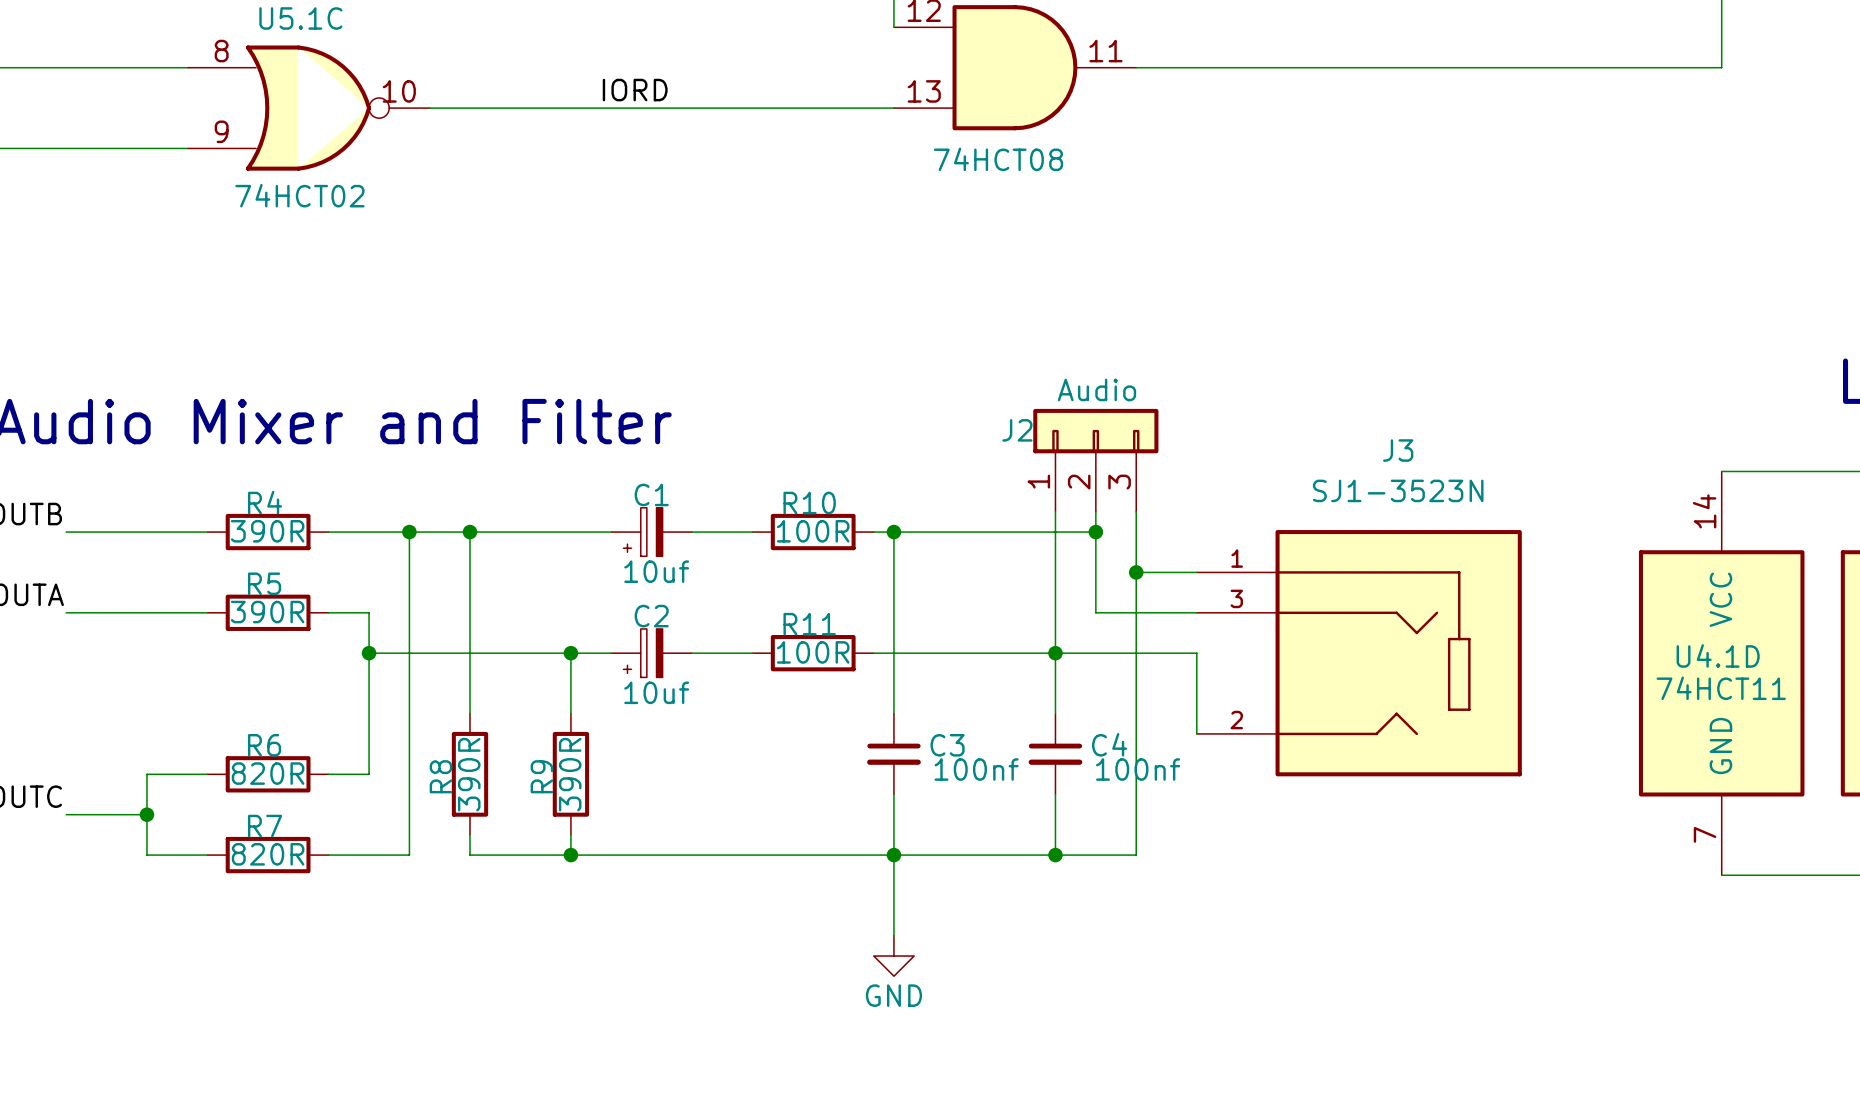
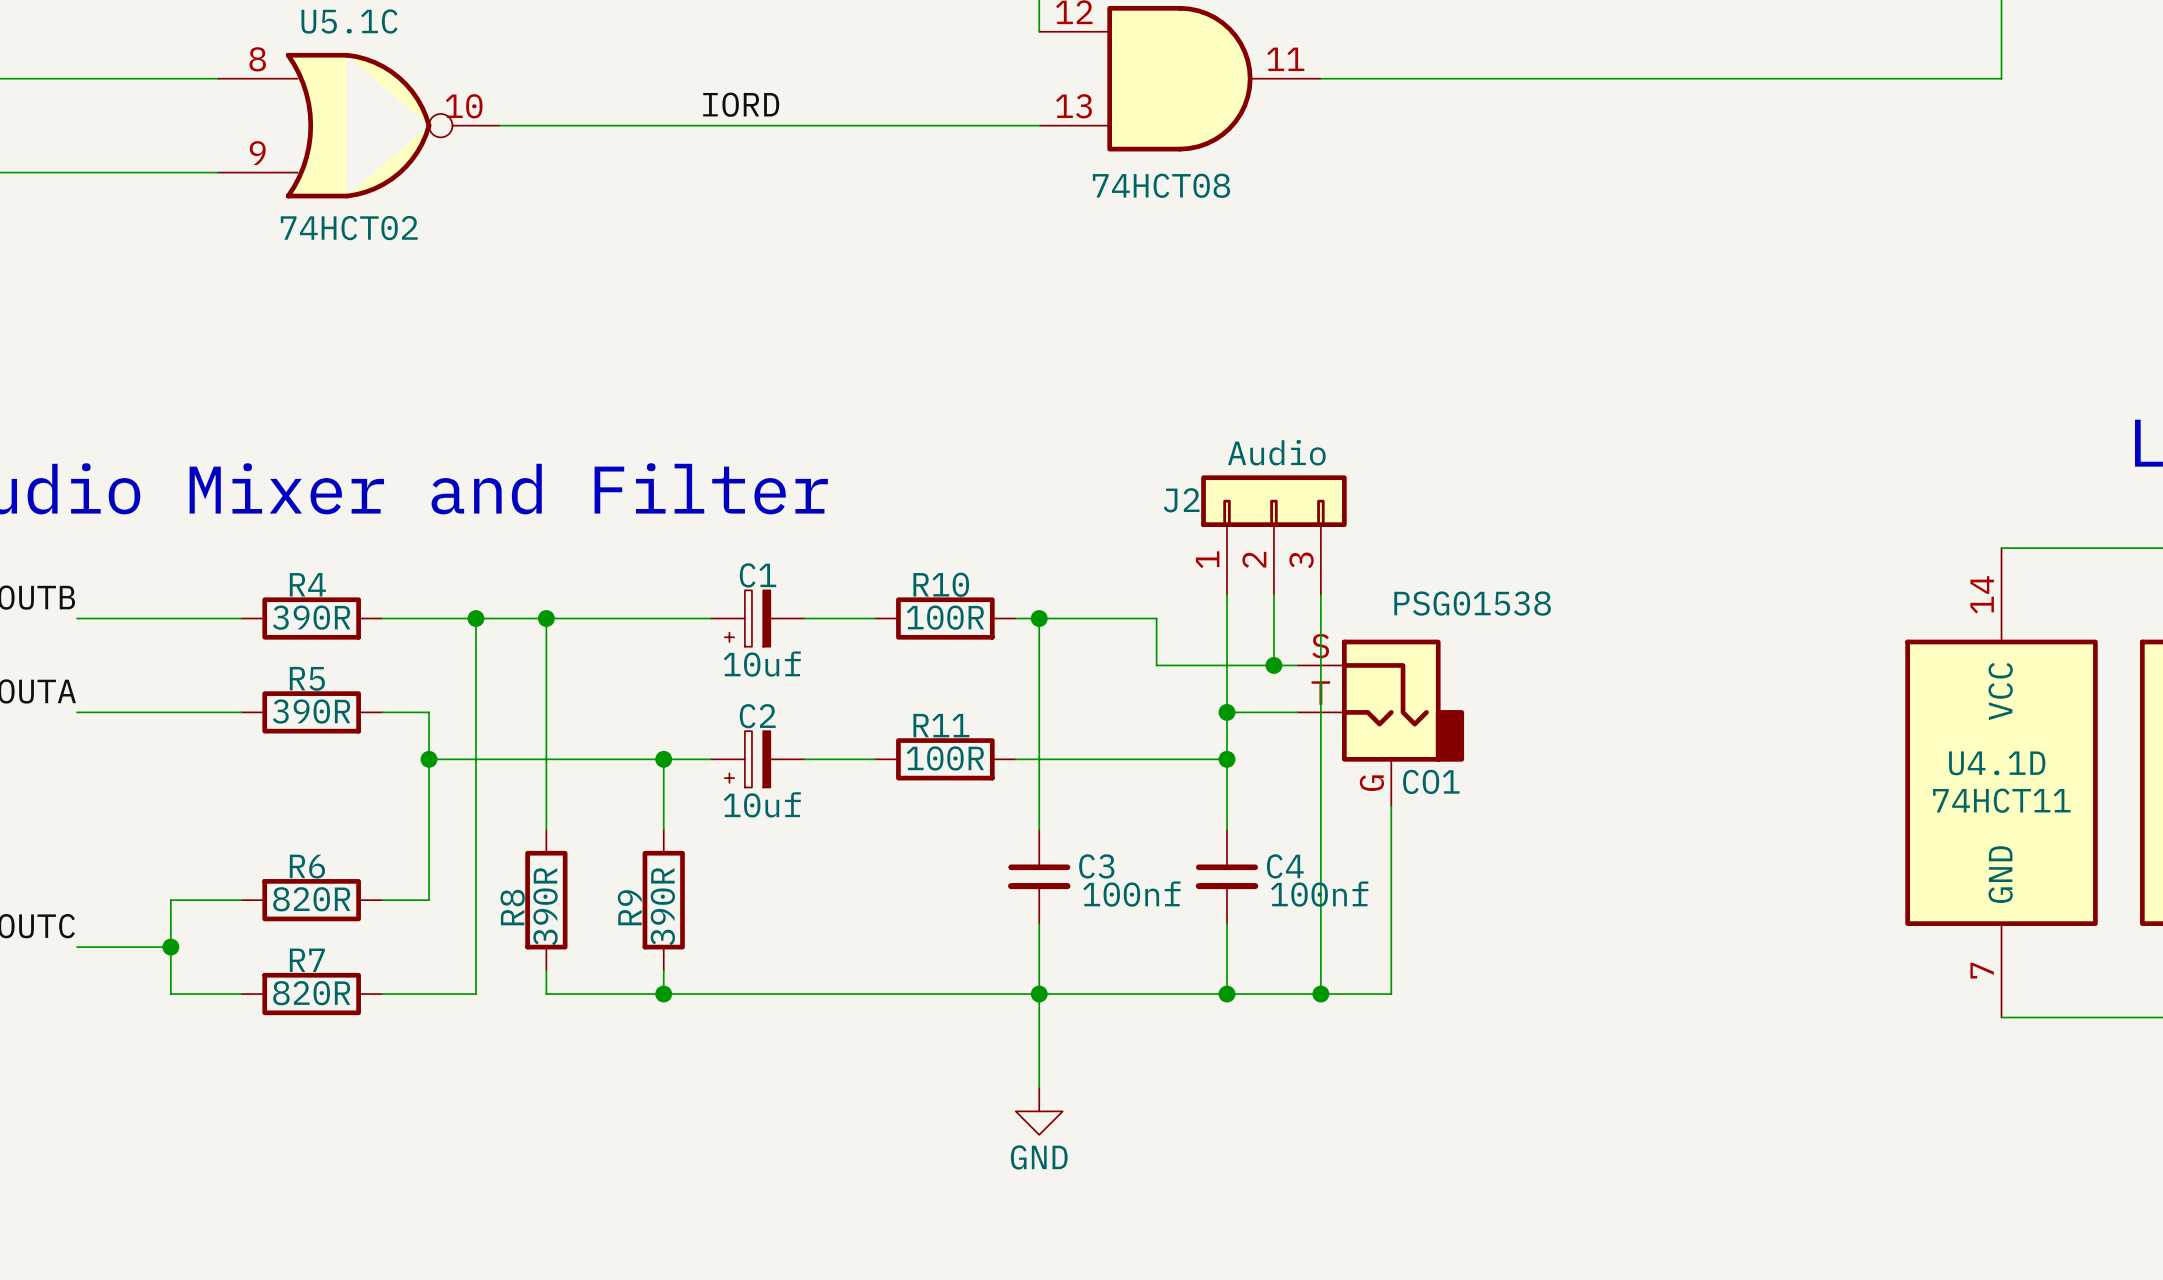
wire: (994, 532) (1095, 532) -> (1156, 618) (1156, 665) (1297, 665)
junction: (1095, 532) -> none
wire: (1095, 572) (1095, 612) -> (1227, 712) (1273, 712)
junction: none -> (1273, 665)
junction: (1136, 572) -> none
junction: none -> (1227, 712)
CO1: none -> PSG01538 (1380, 722)
wire: (1055, 653) (1196, 653) (1196, 693) -> none
J3: SJ1-3523N (1359, 653) -> none
wire: none -> (1391, 853) (1391, 994) (1320, 994)
junction: none -> (1320, 994)

